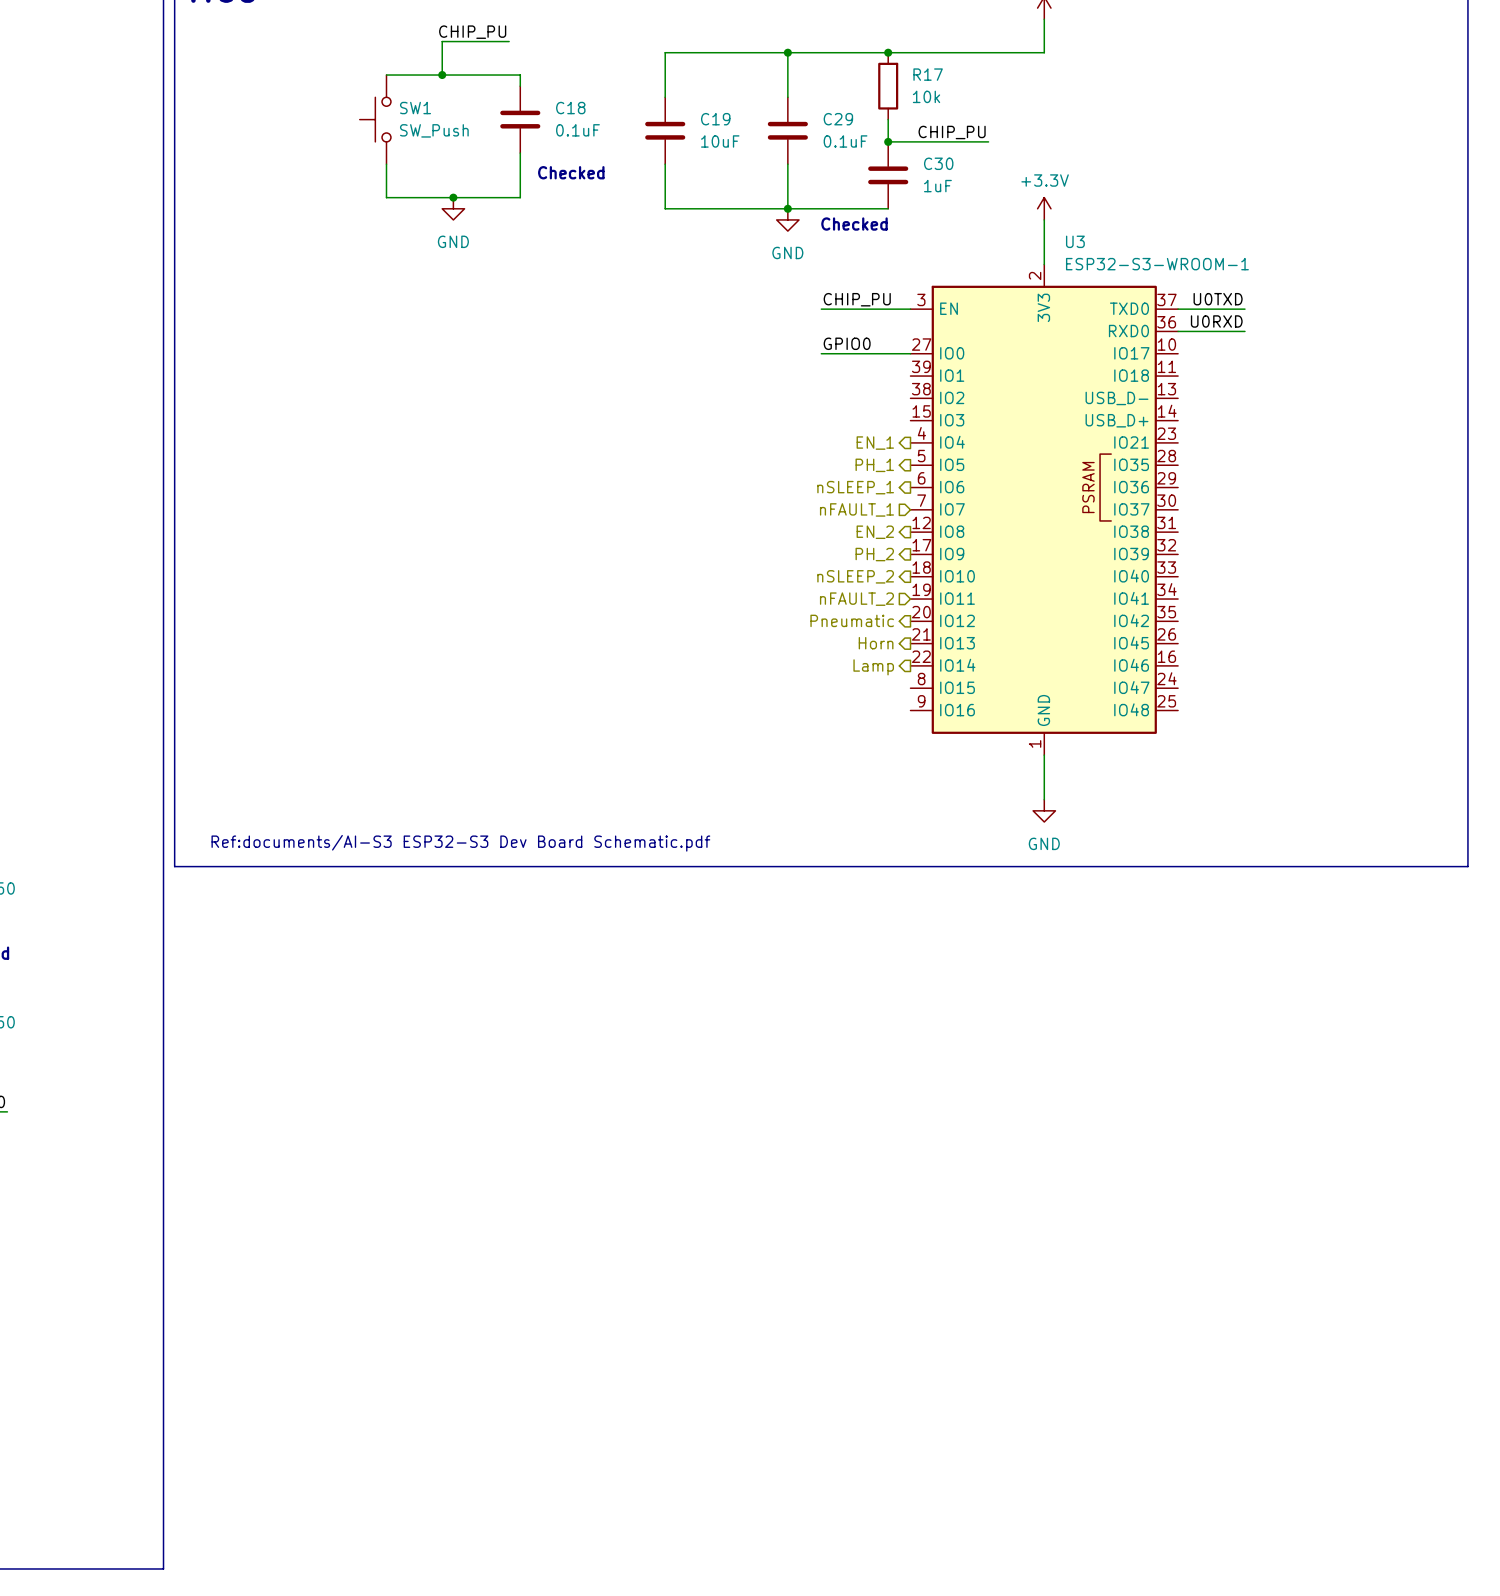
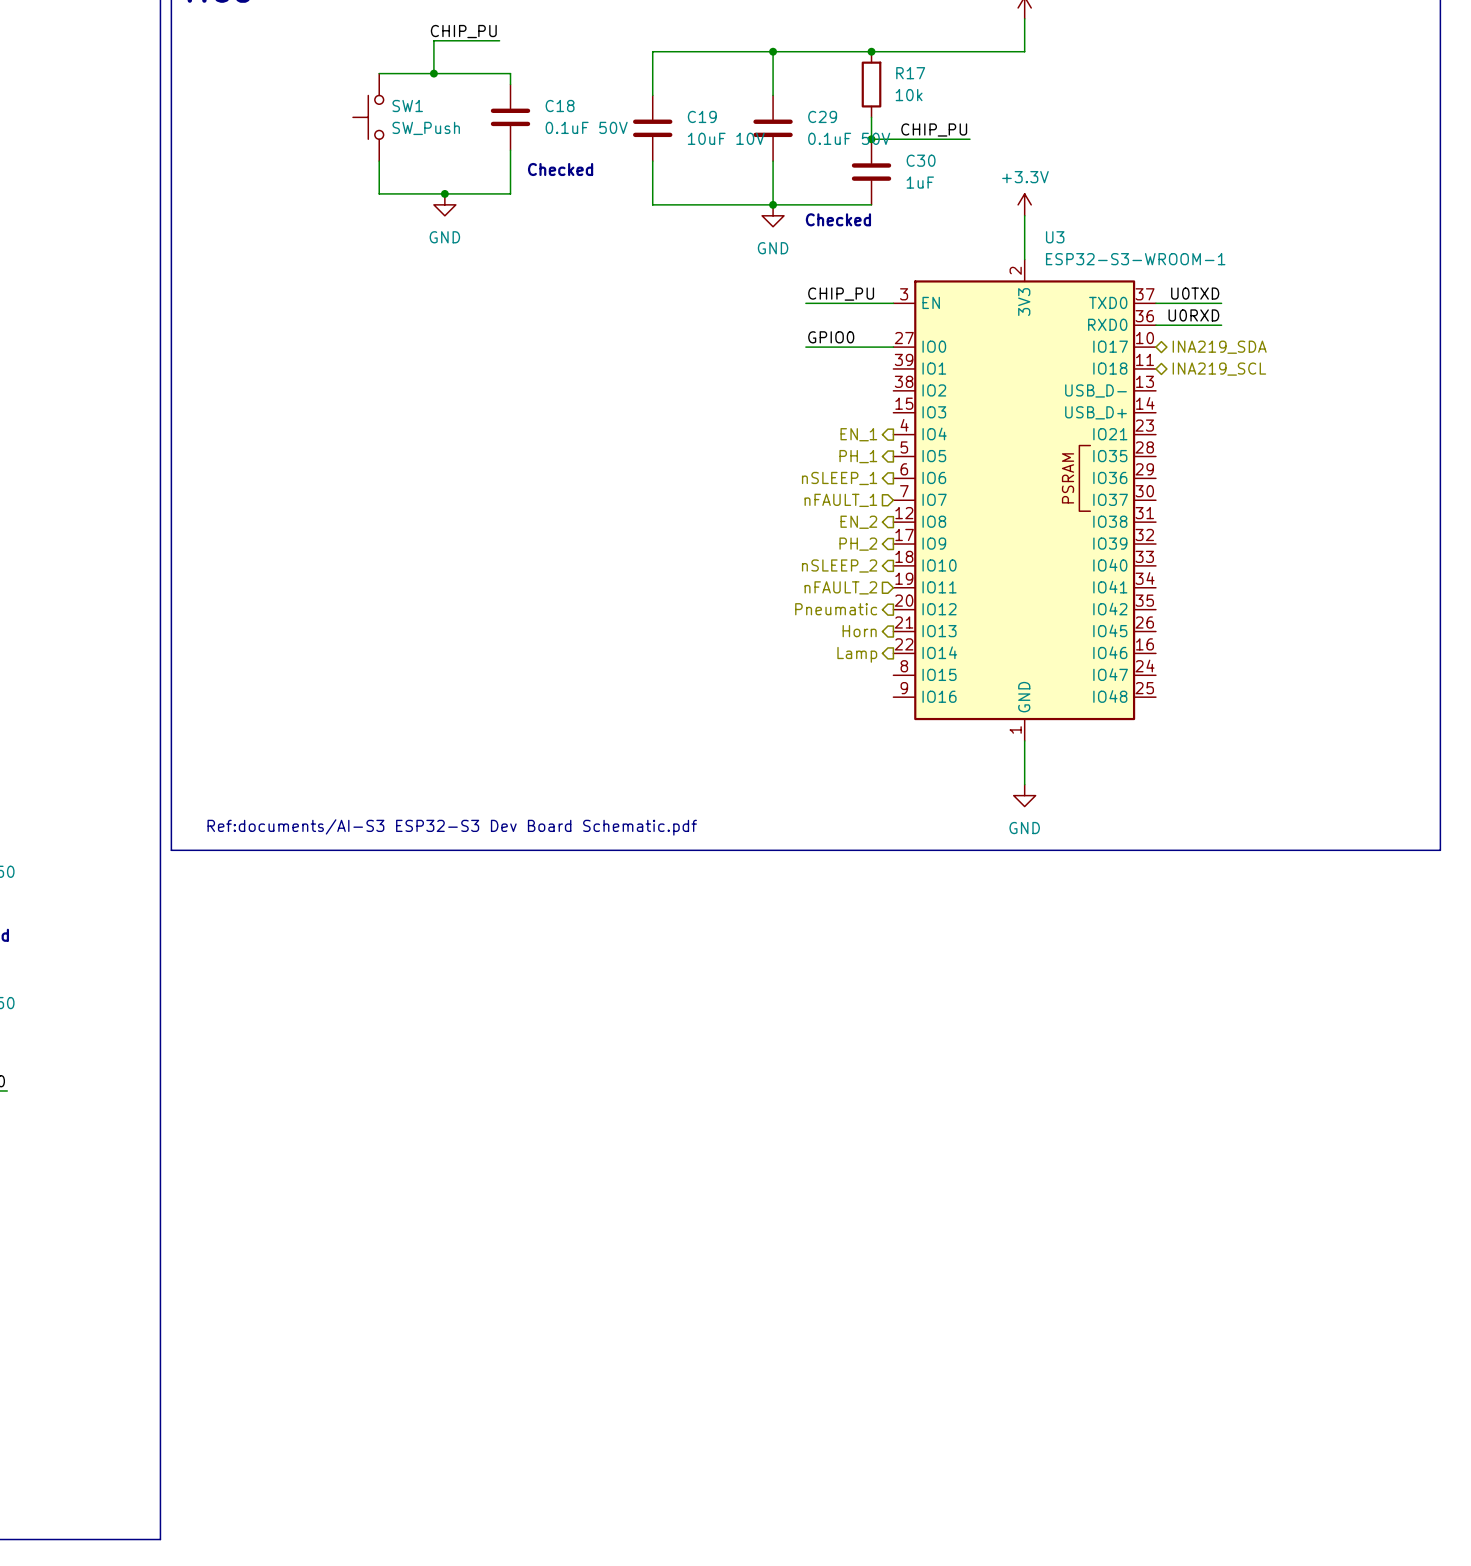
C18 value: 0.1uF (577, 130) -> 0.1uF 50V (586, 127)
C19 value: 10uF (720, 141) -> 10uF 10V (726, 138)
C29 value: 0.1uF (845, 141) -> 0.1uF 50V (849, 138)
hierarchical label: none -> INA219_SDA (1219, 347)
hierarchical label: none -> INA219_SCL (1219, 369)

